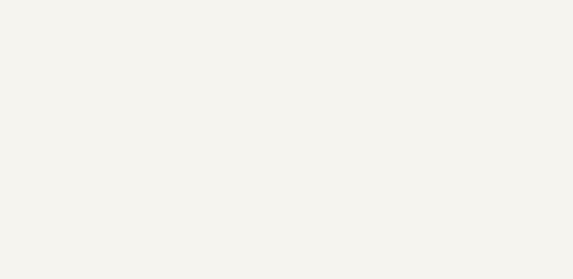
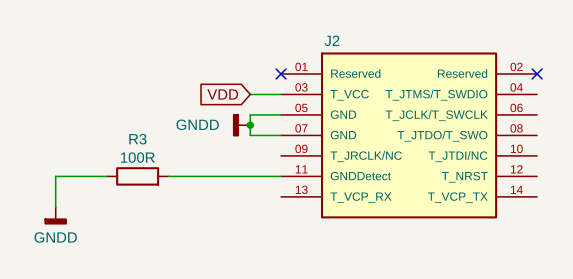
no-connect mark: none -> (281, 73)
no-connect mark: none -> (537, 73)
global label: none -> VDD (222, 94)
wire: none -> (250, 94) (281, 94)
wire: none -> (281, 114) (250, 114) (250, 135) (281, 135)
power symbol: none -> GNDD (241, 125)
junction: none -> (250, 125)
J2: none -> (409, 135)
wire: none -> (106, 176) (55, 176) (55, 207)
R3: none -> 100R (137, 176)
wire: none -> (168, 176) (281, 176)
power symbol: none -> GNDD (55, 215)

